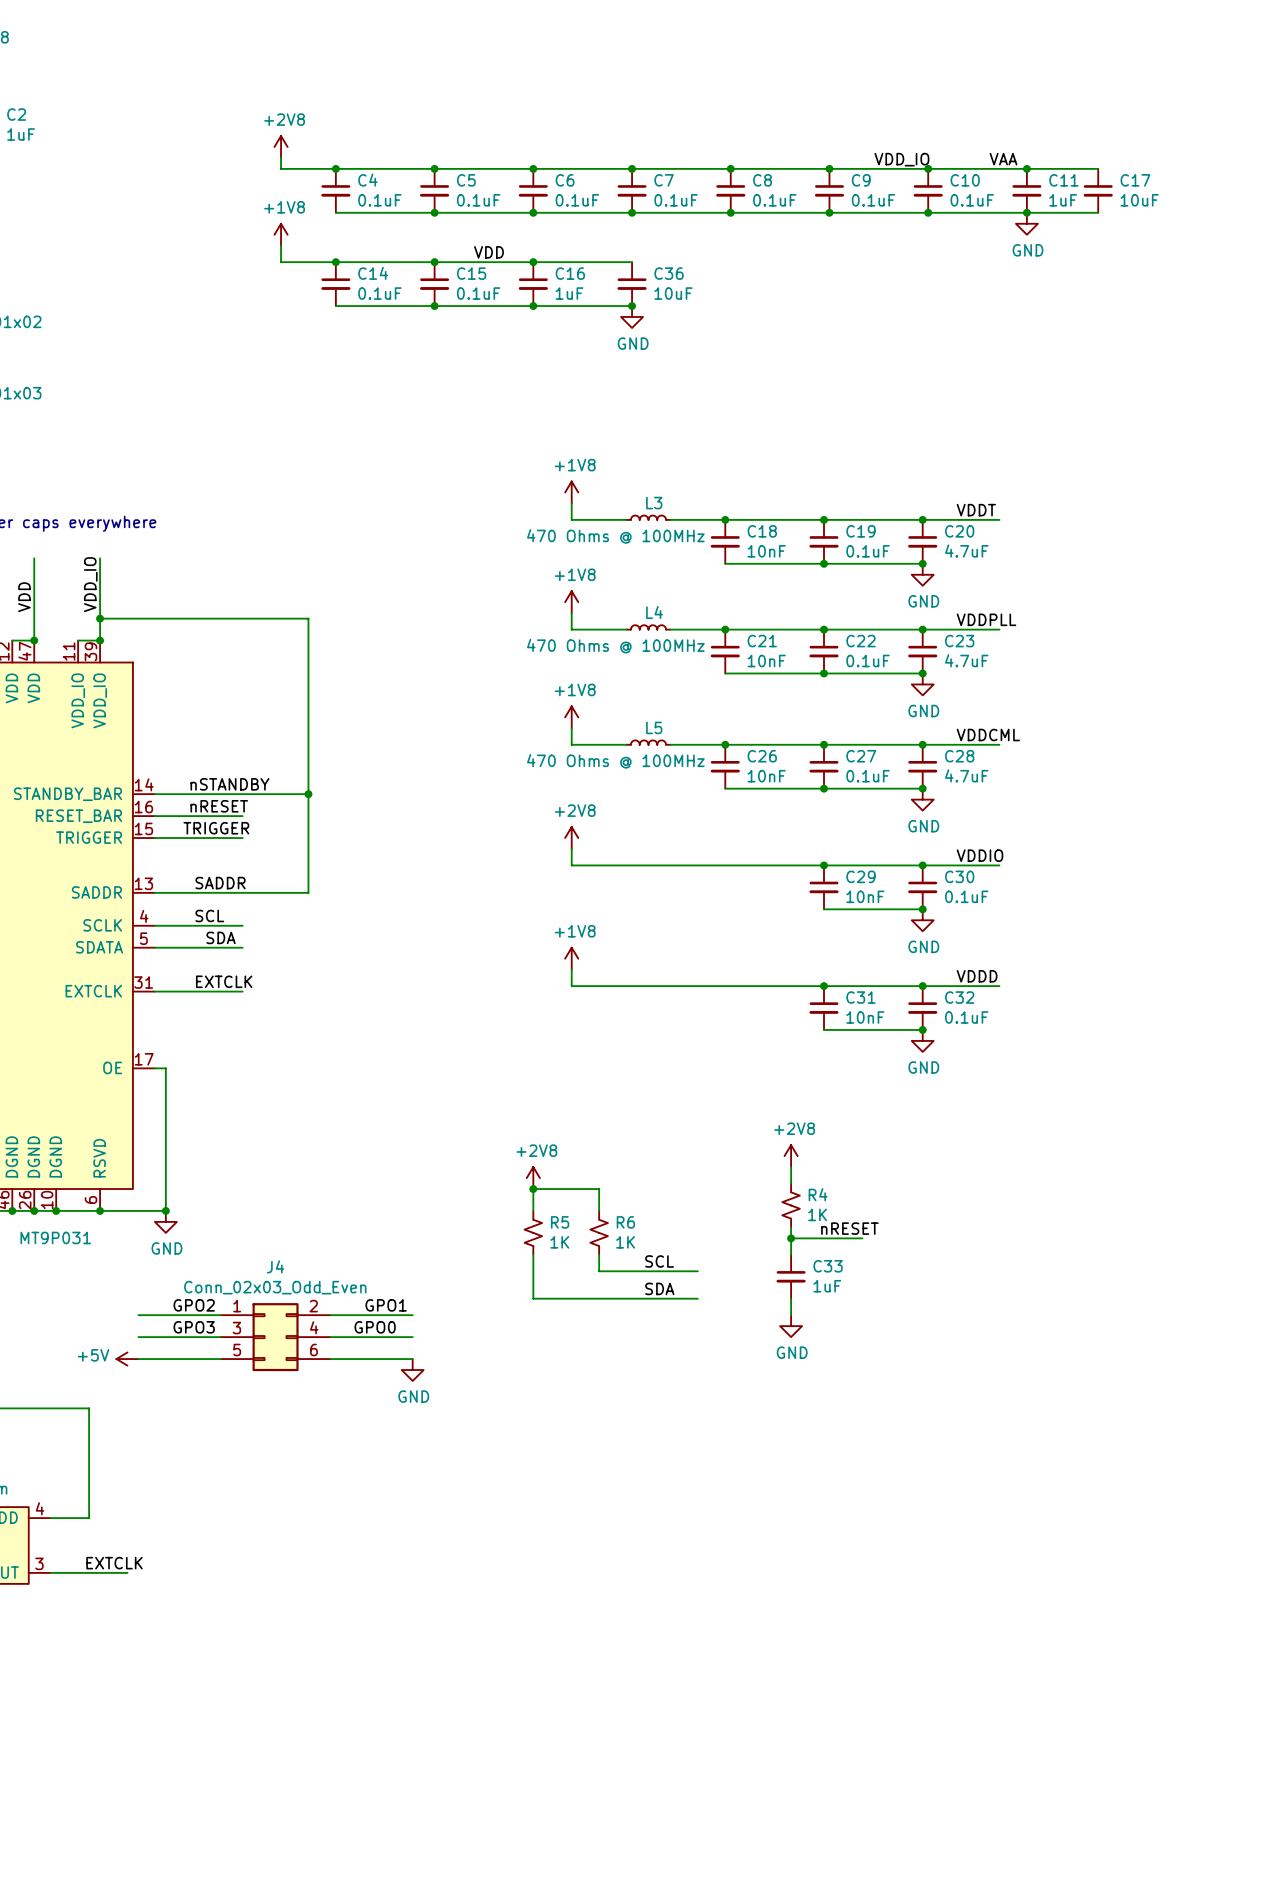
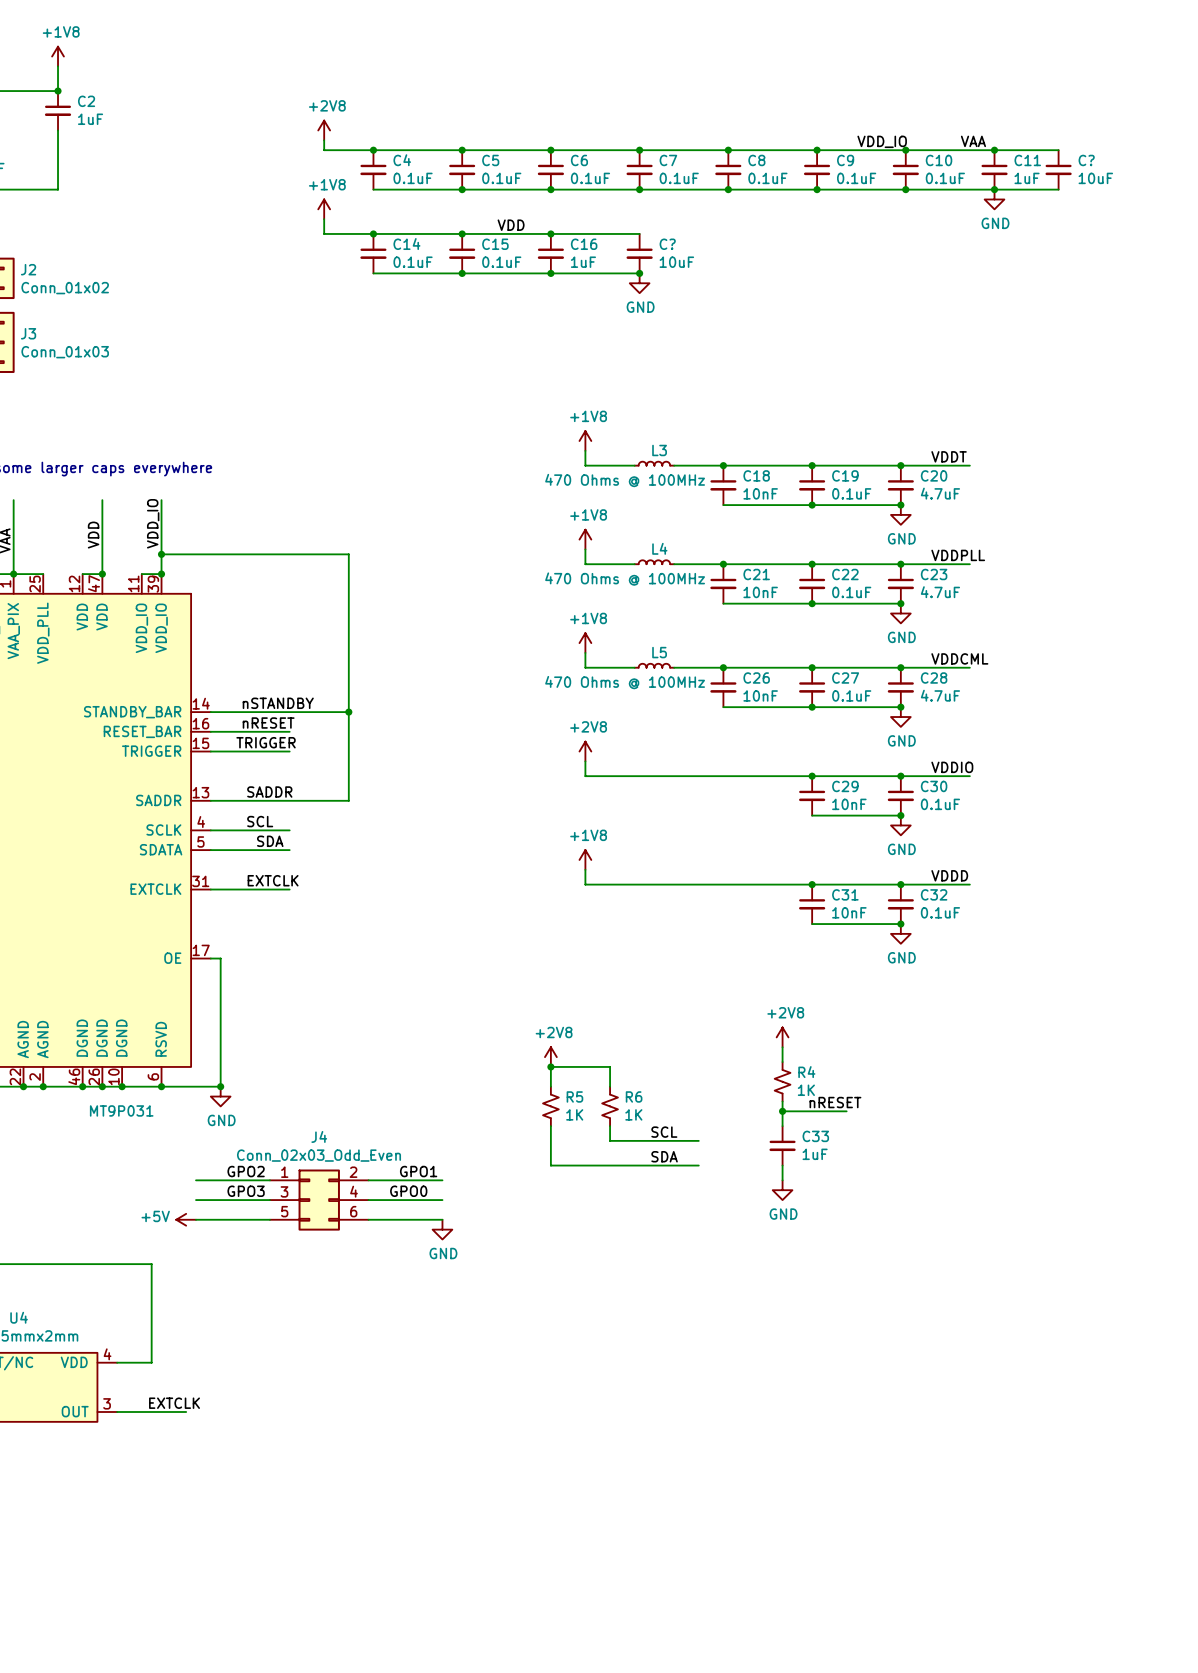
C17 name: C17 (1135, 180) -> C? (1086, 160)
C36 name: C36 (669, 273) -> C? (667, 244)

